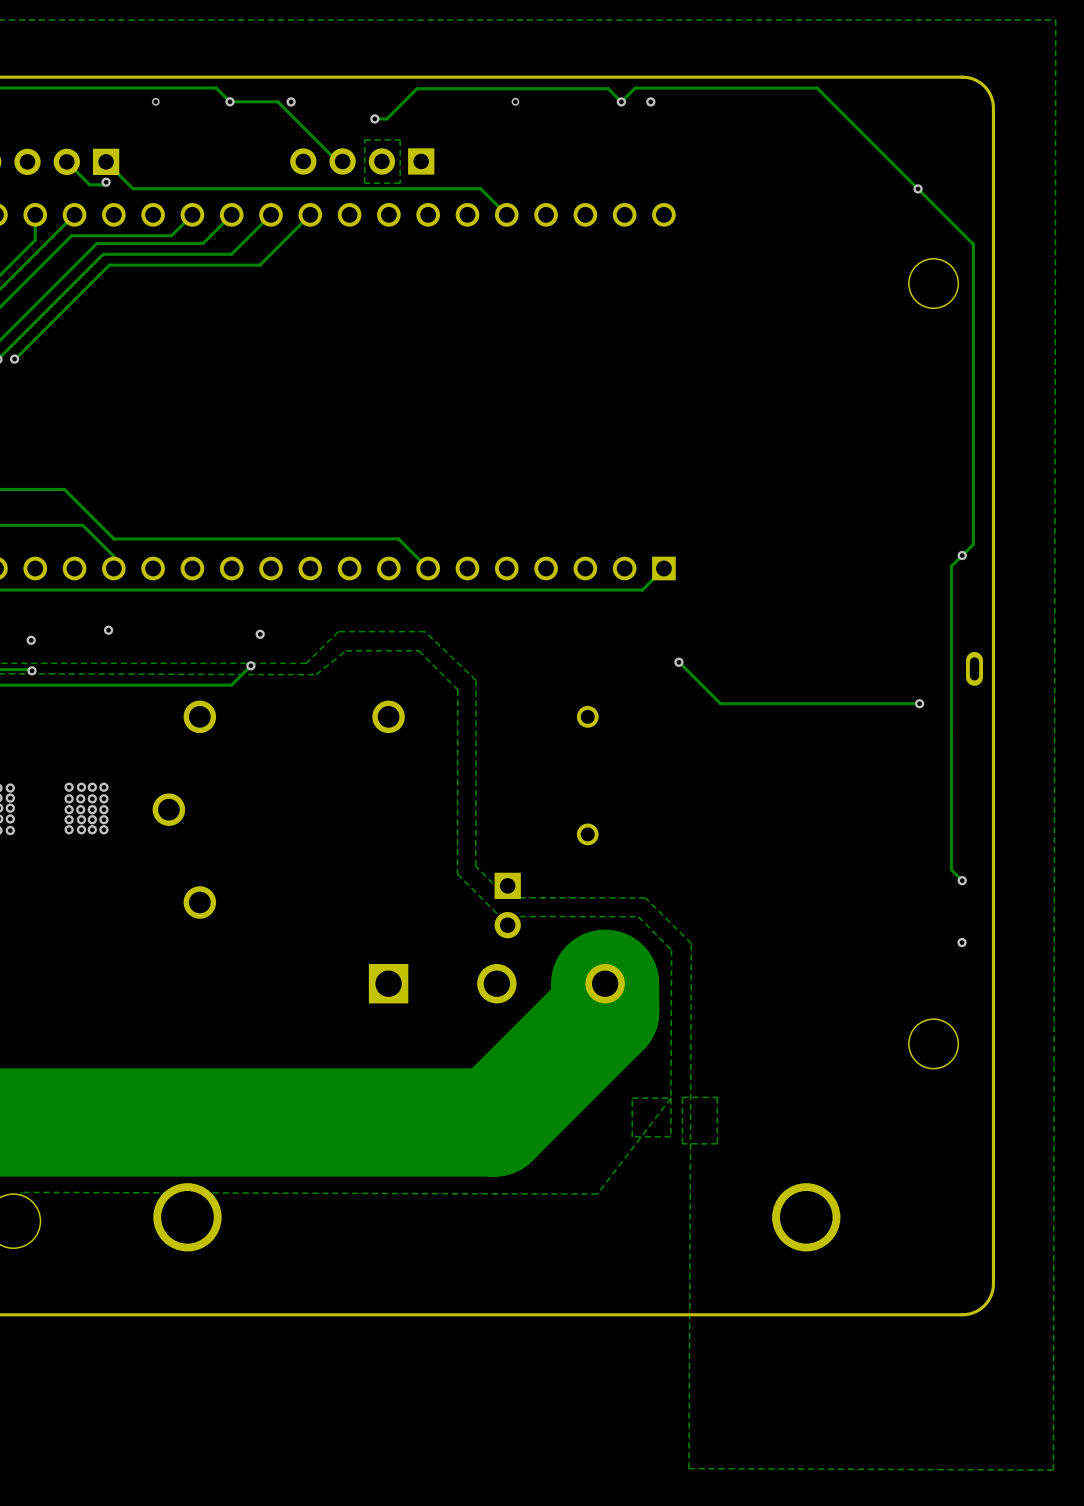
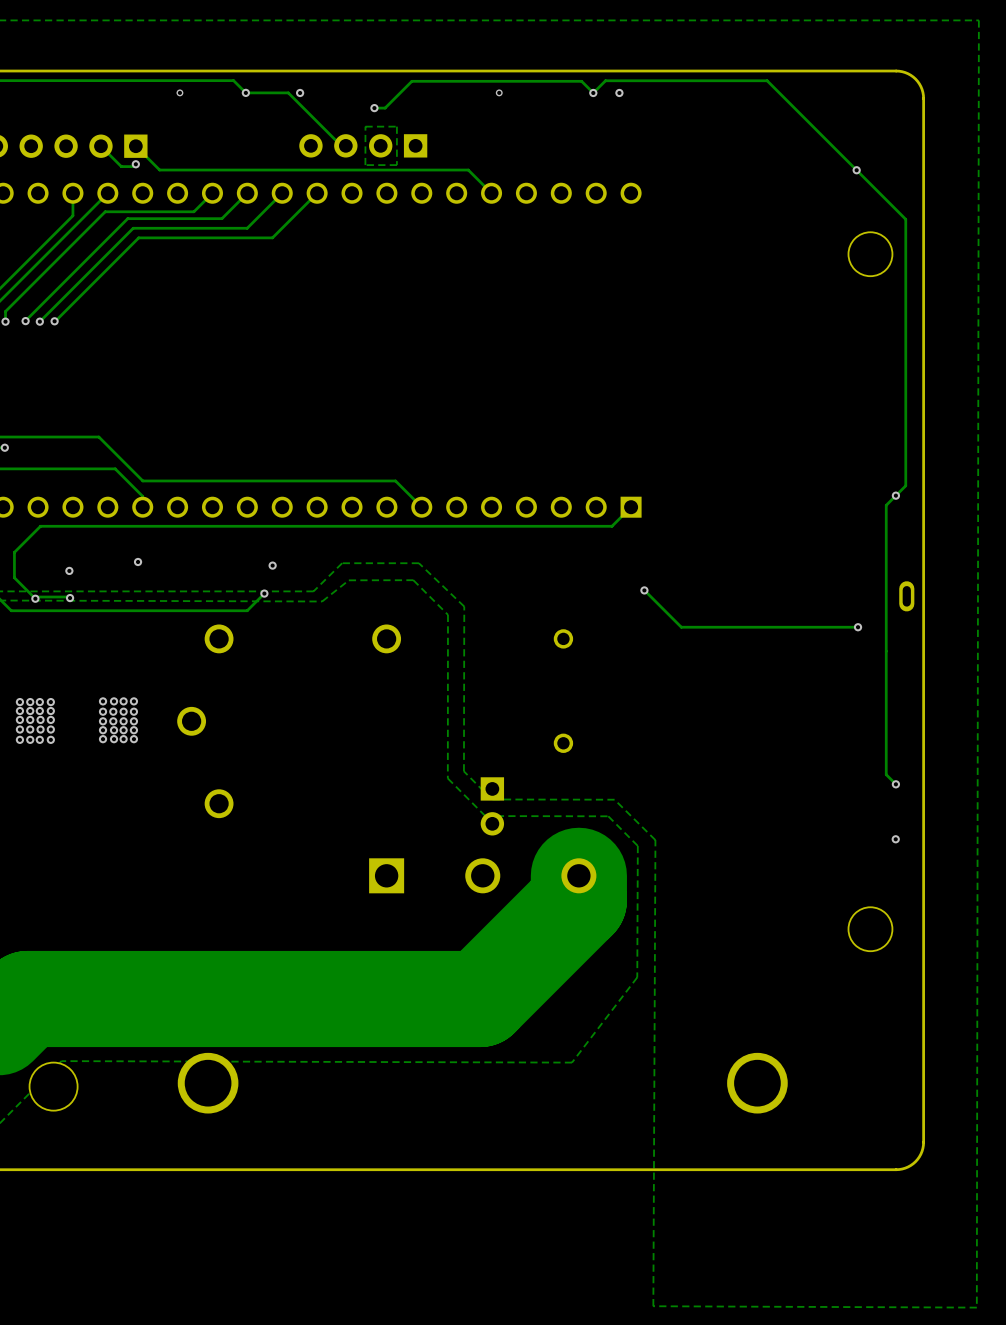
zone outline: (717, 1097) (682, 1097) (682, 1143) (717, 1143) (717, 1097) -> none
zone outline: (670, 1098) (670, 1136) (632, 1136) (632, 1098) (670, 1098) -> none

